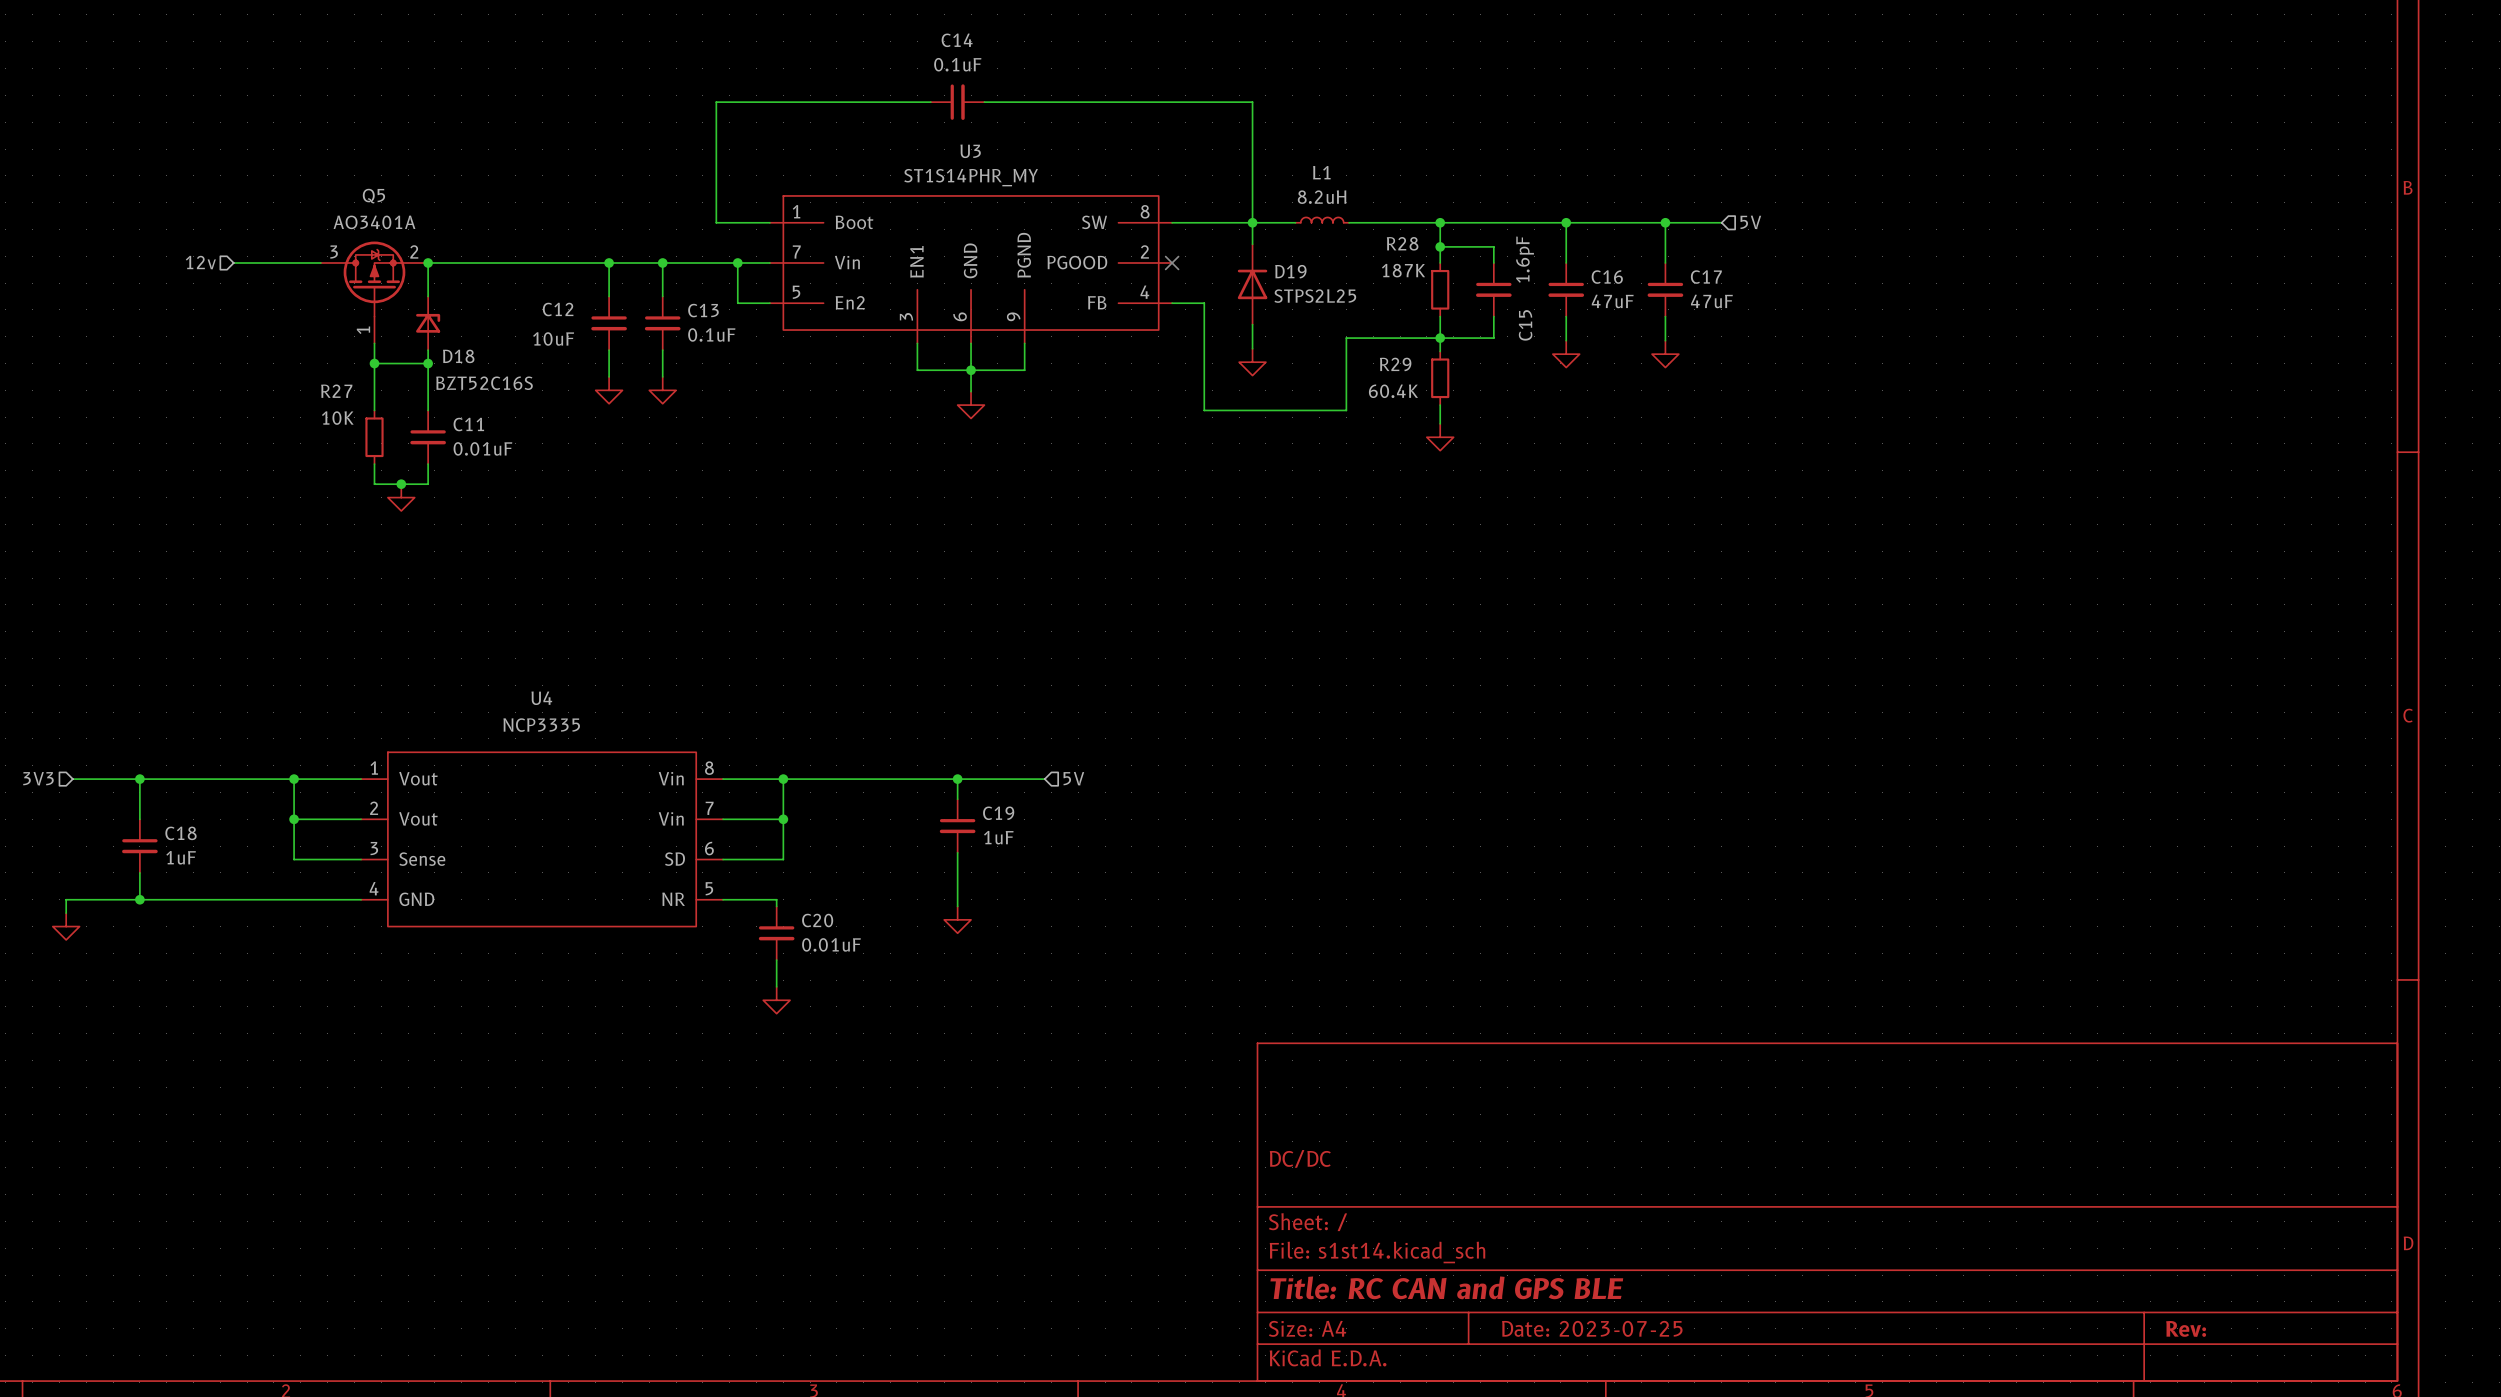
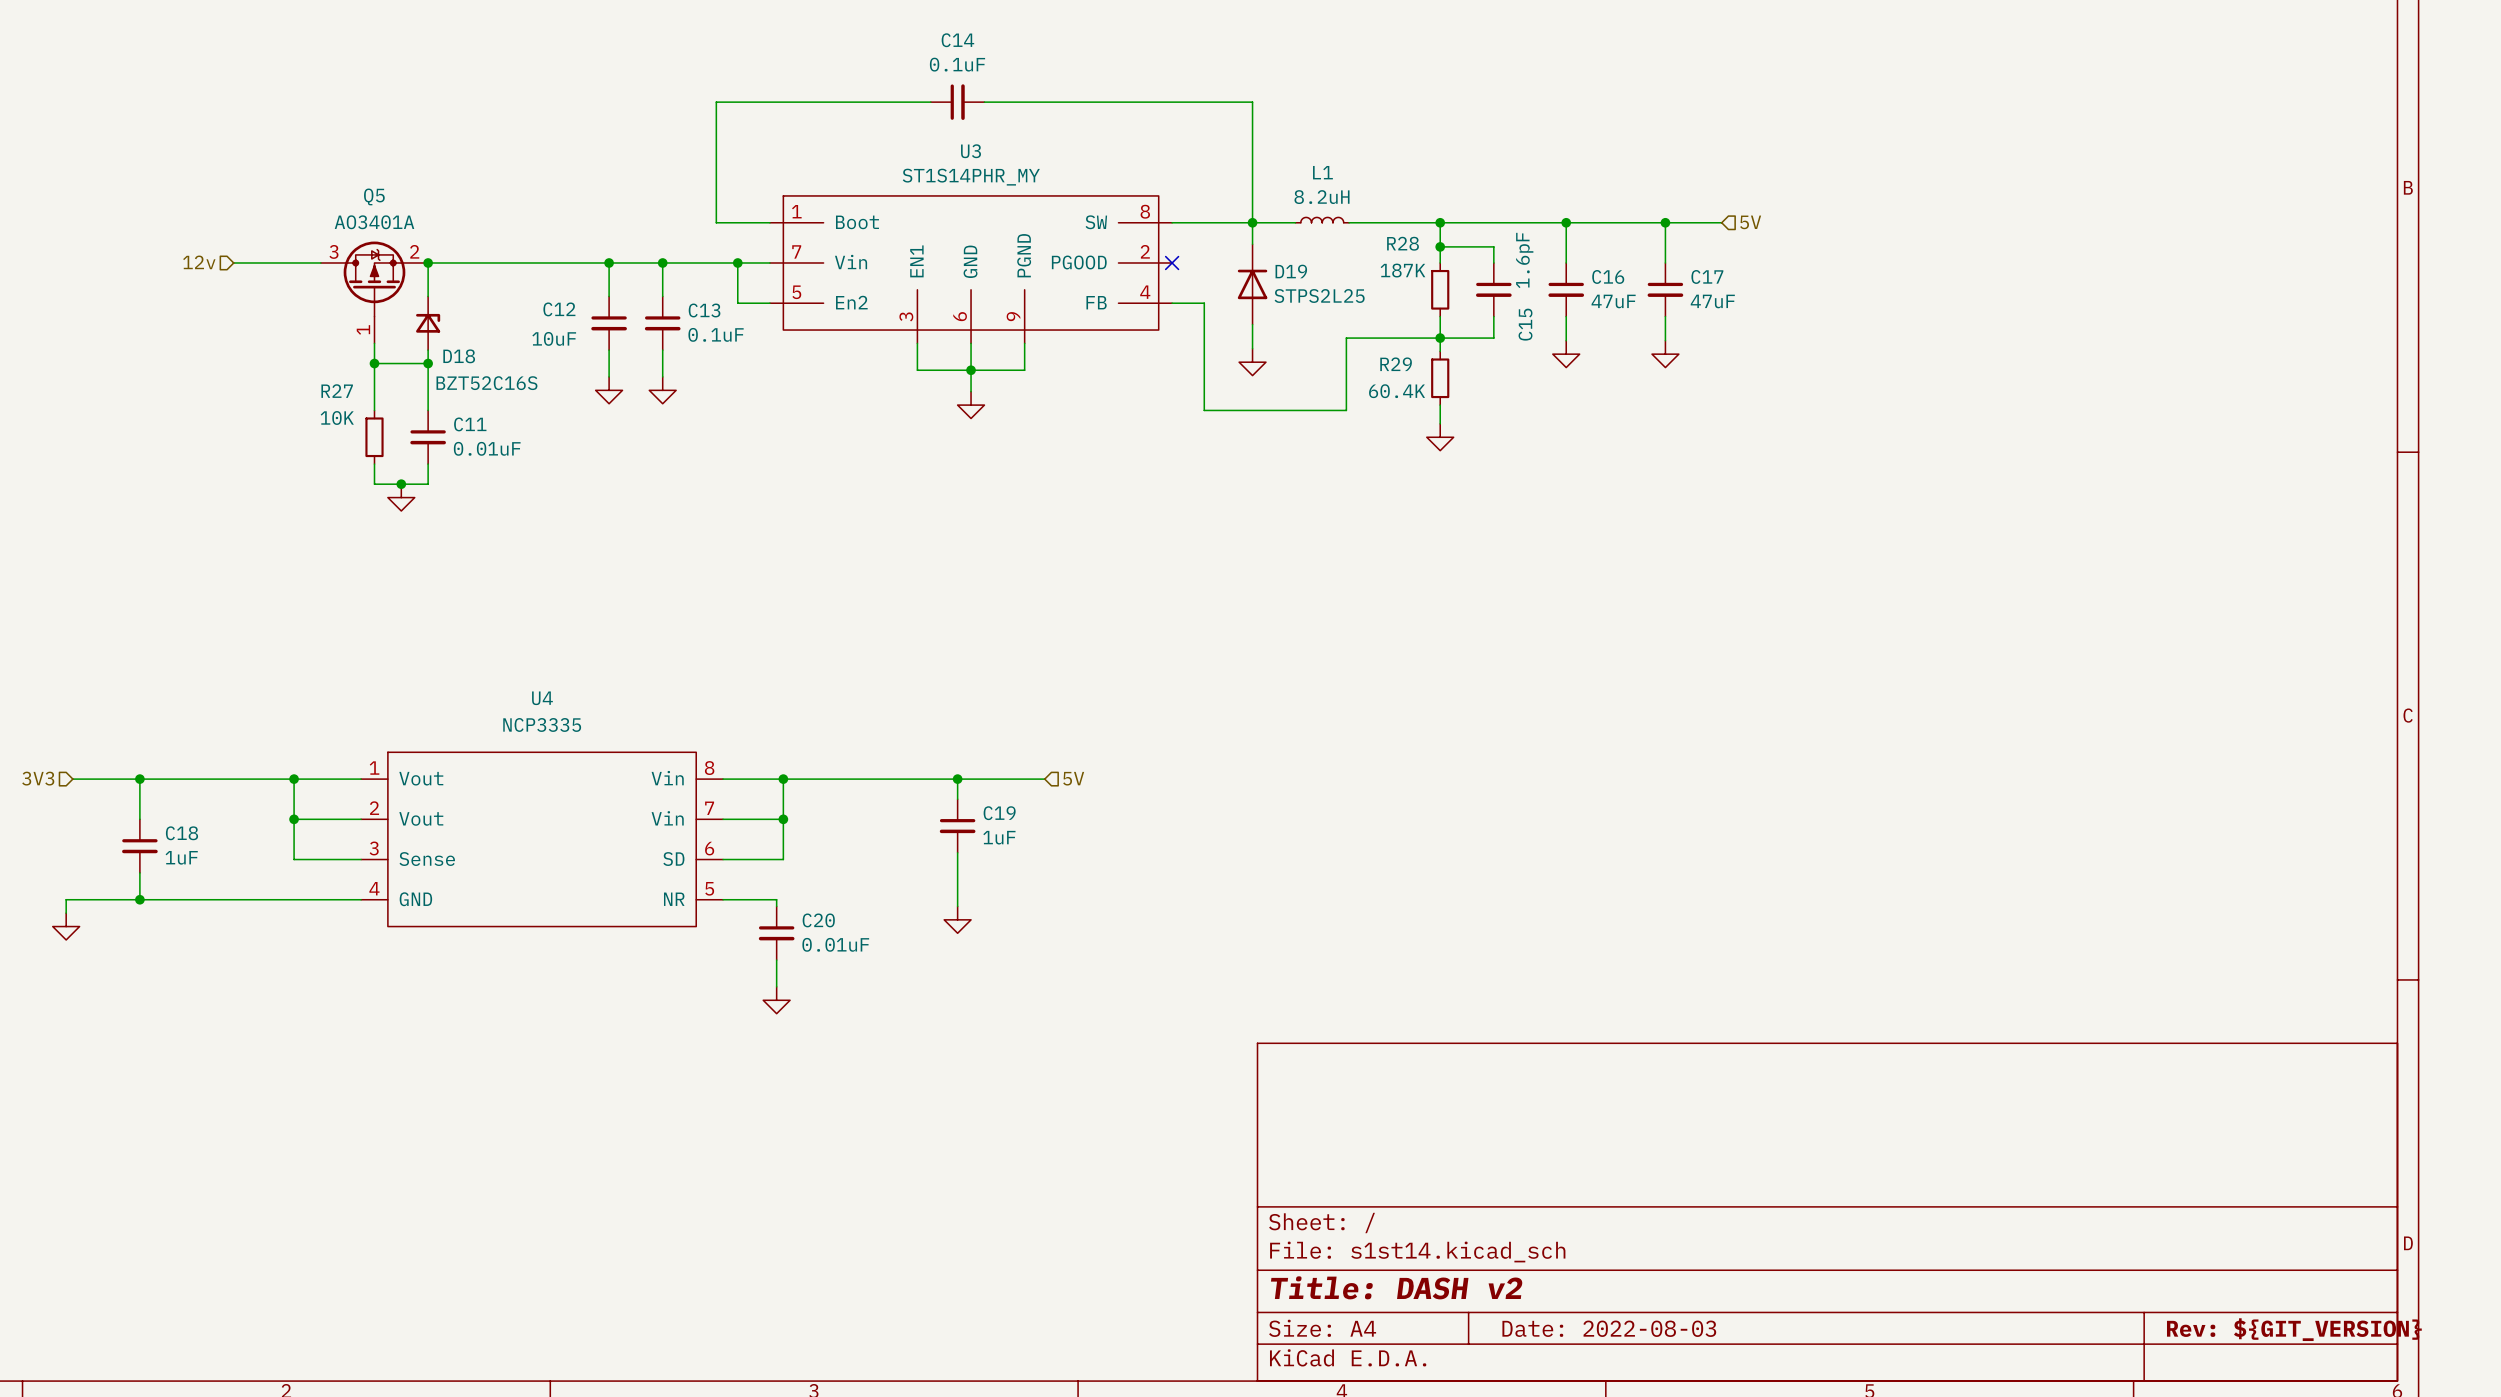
title block: DC/DC (1300, 1158) -> none
title block: Title: RC CAN and GPS BLE (1446, 1287) -> Title: DASH v2 (1396, 1287)
title block: Date: 2023-07-25 (1592, 1328) -> Date: 2022-08-03 (1609, 1328)
title block: Rev: (2186, 1328) -> Rev: ${GIT_VERSION} (2294, 1329)

